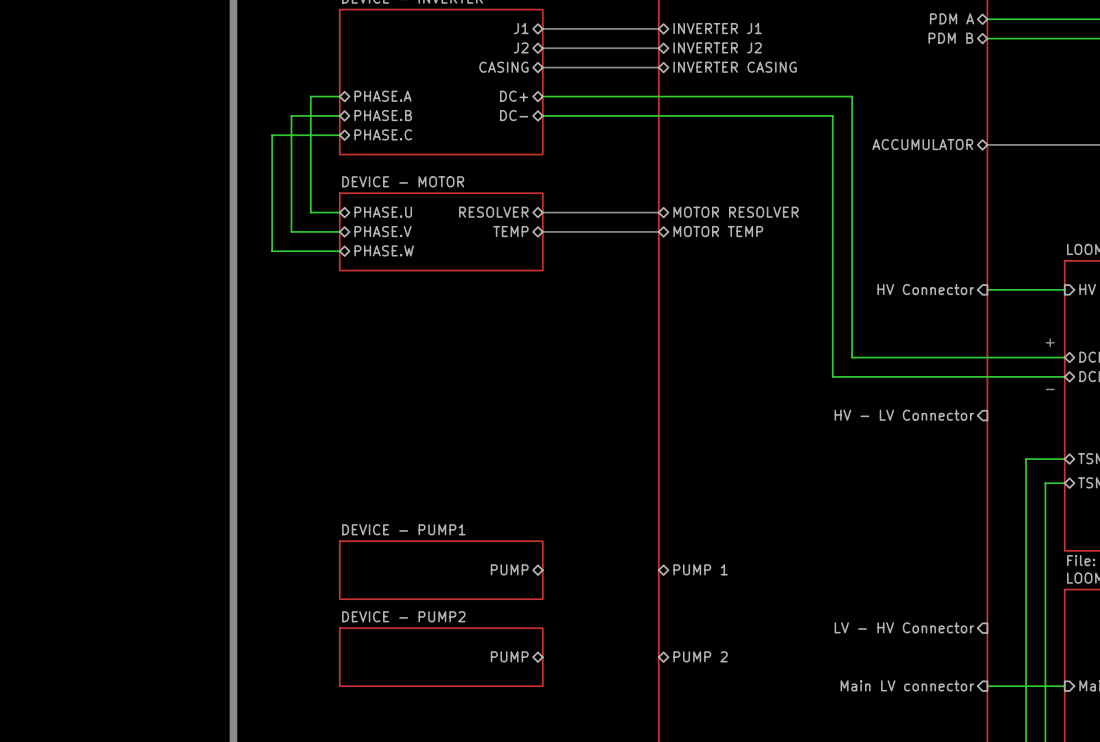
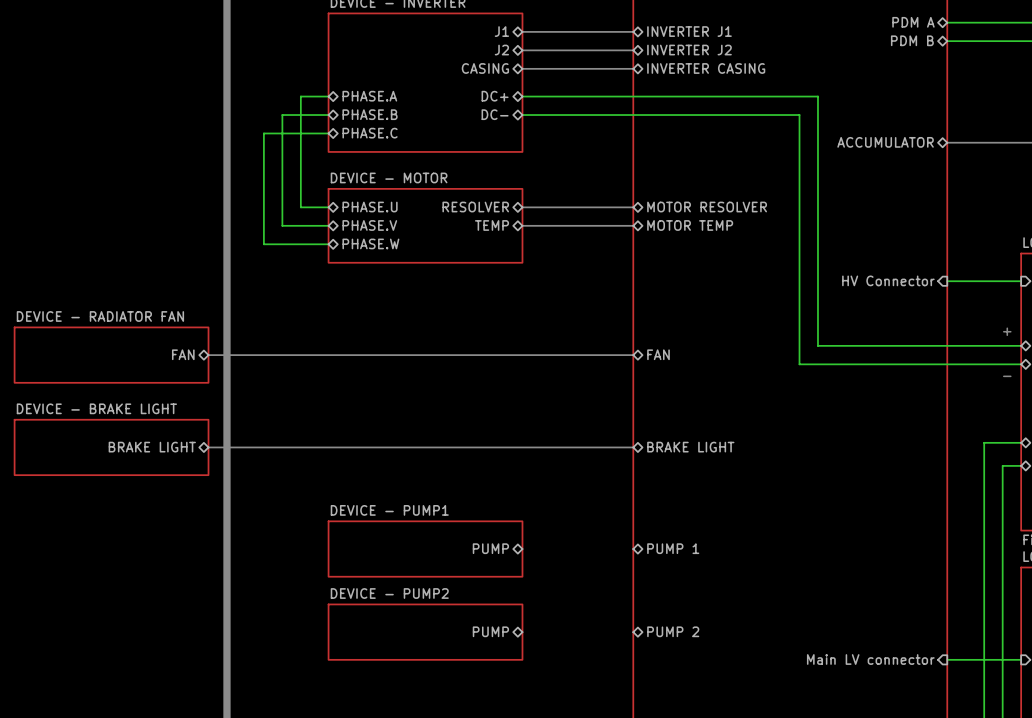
sheet pin: none -> FAN (183, 354)
sheet pin: none -> FAN (658, 354)
sheet DEVICE - RADIATOR FAN: none -> (111, 355)
bus: none -> (208, 355) (633, 355)
sheet pin: HV - LV Connector (904, 415) -> none
sheet DEVICE - BRAKE LIGHT: none -> (111, 447)
sheet pin: none -> BRAKE LIGHT (152, 447)
bus: none -> (208, 447) (633, 447)
sheet pin: none -> BRAKE LIGHT (690, 447)
sheet pin: LV - HV Connector (904, 627) -> none

